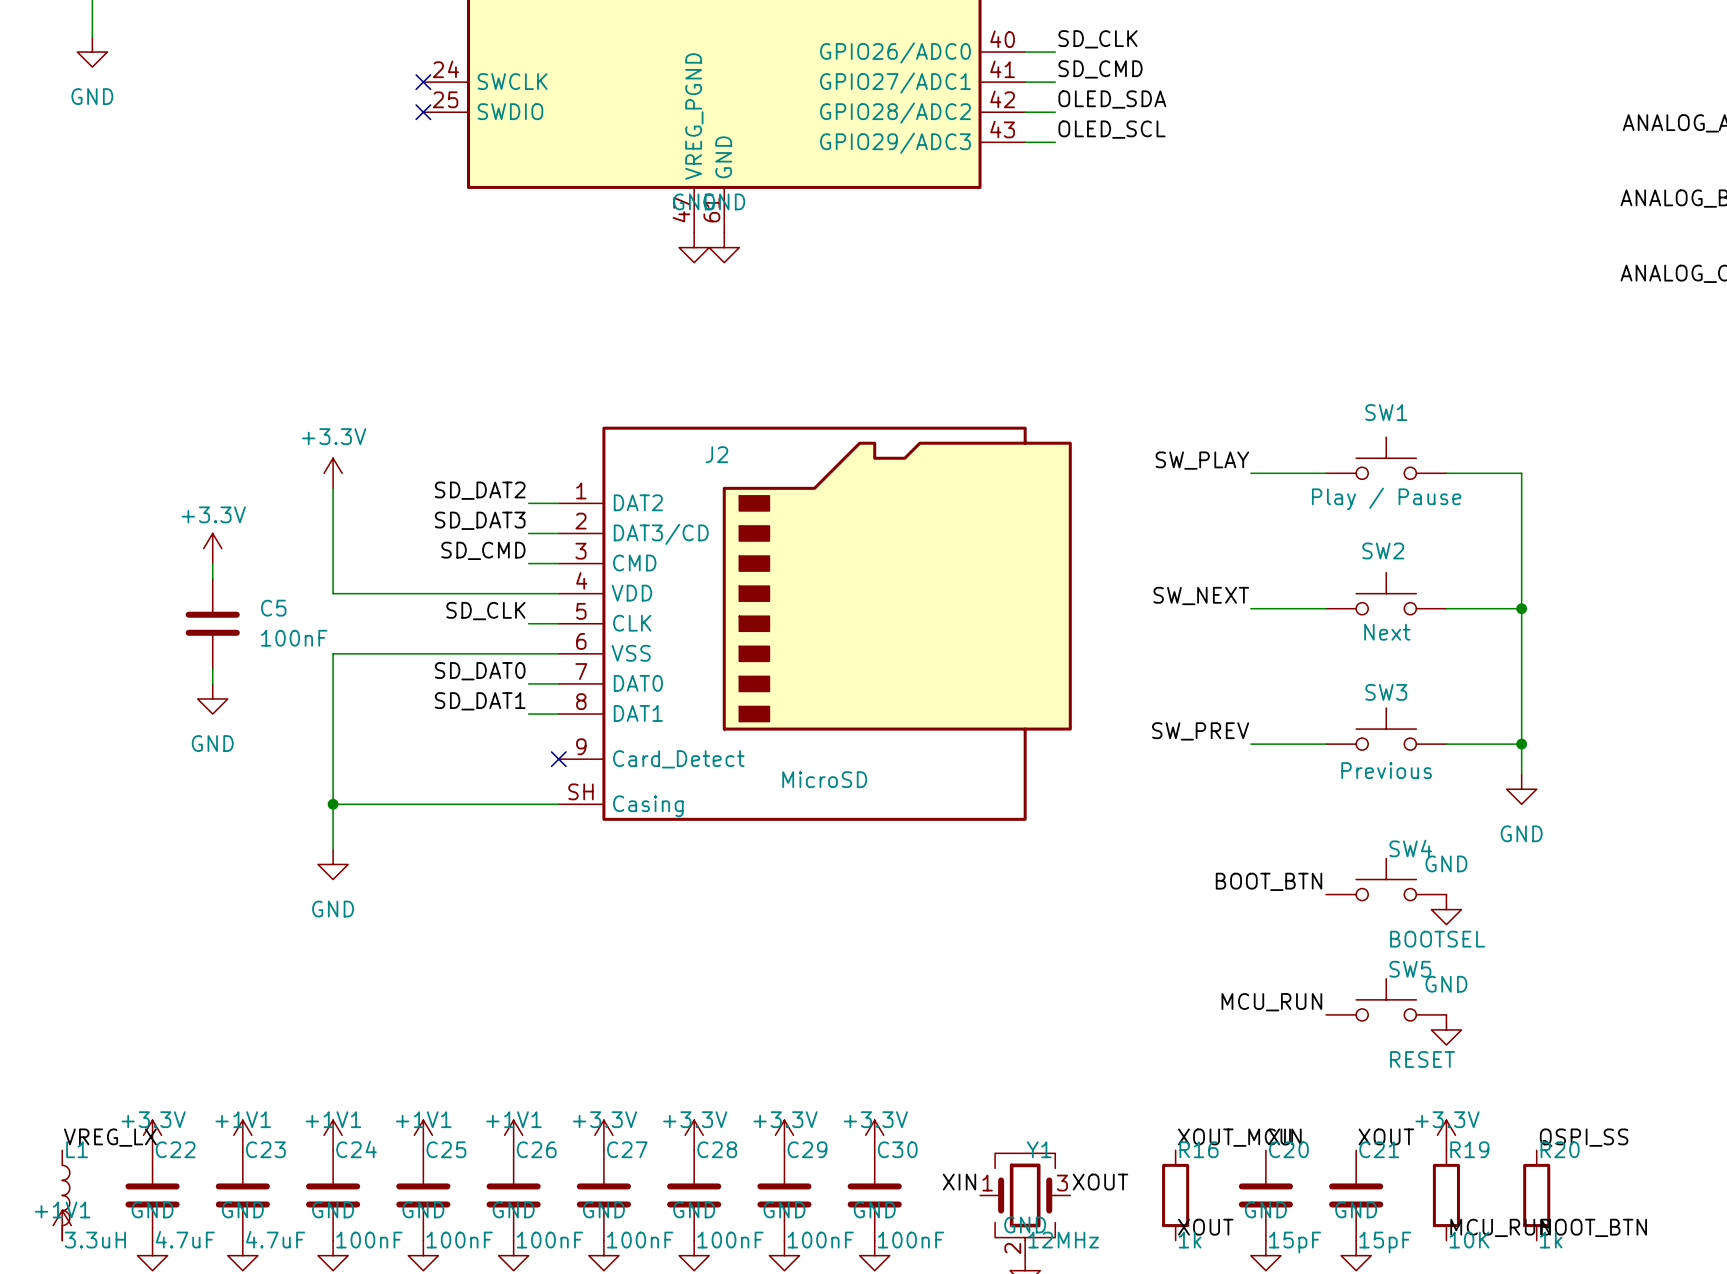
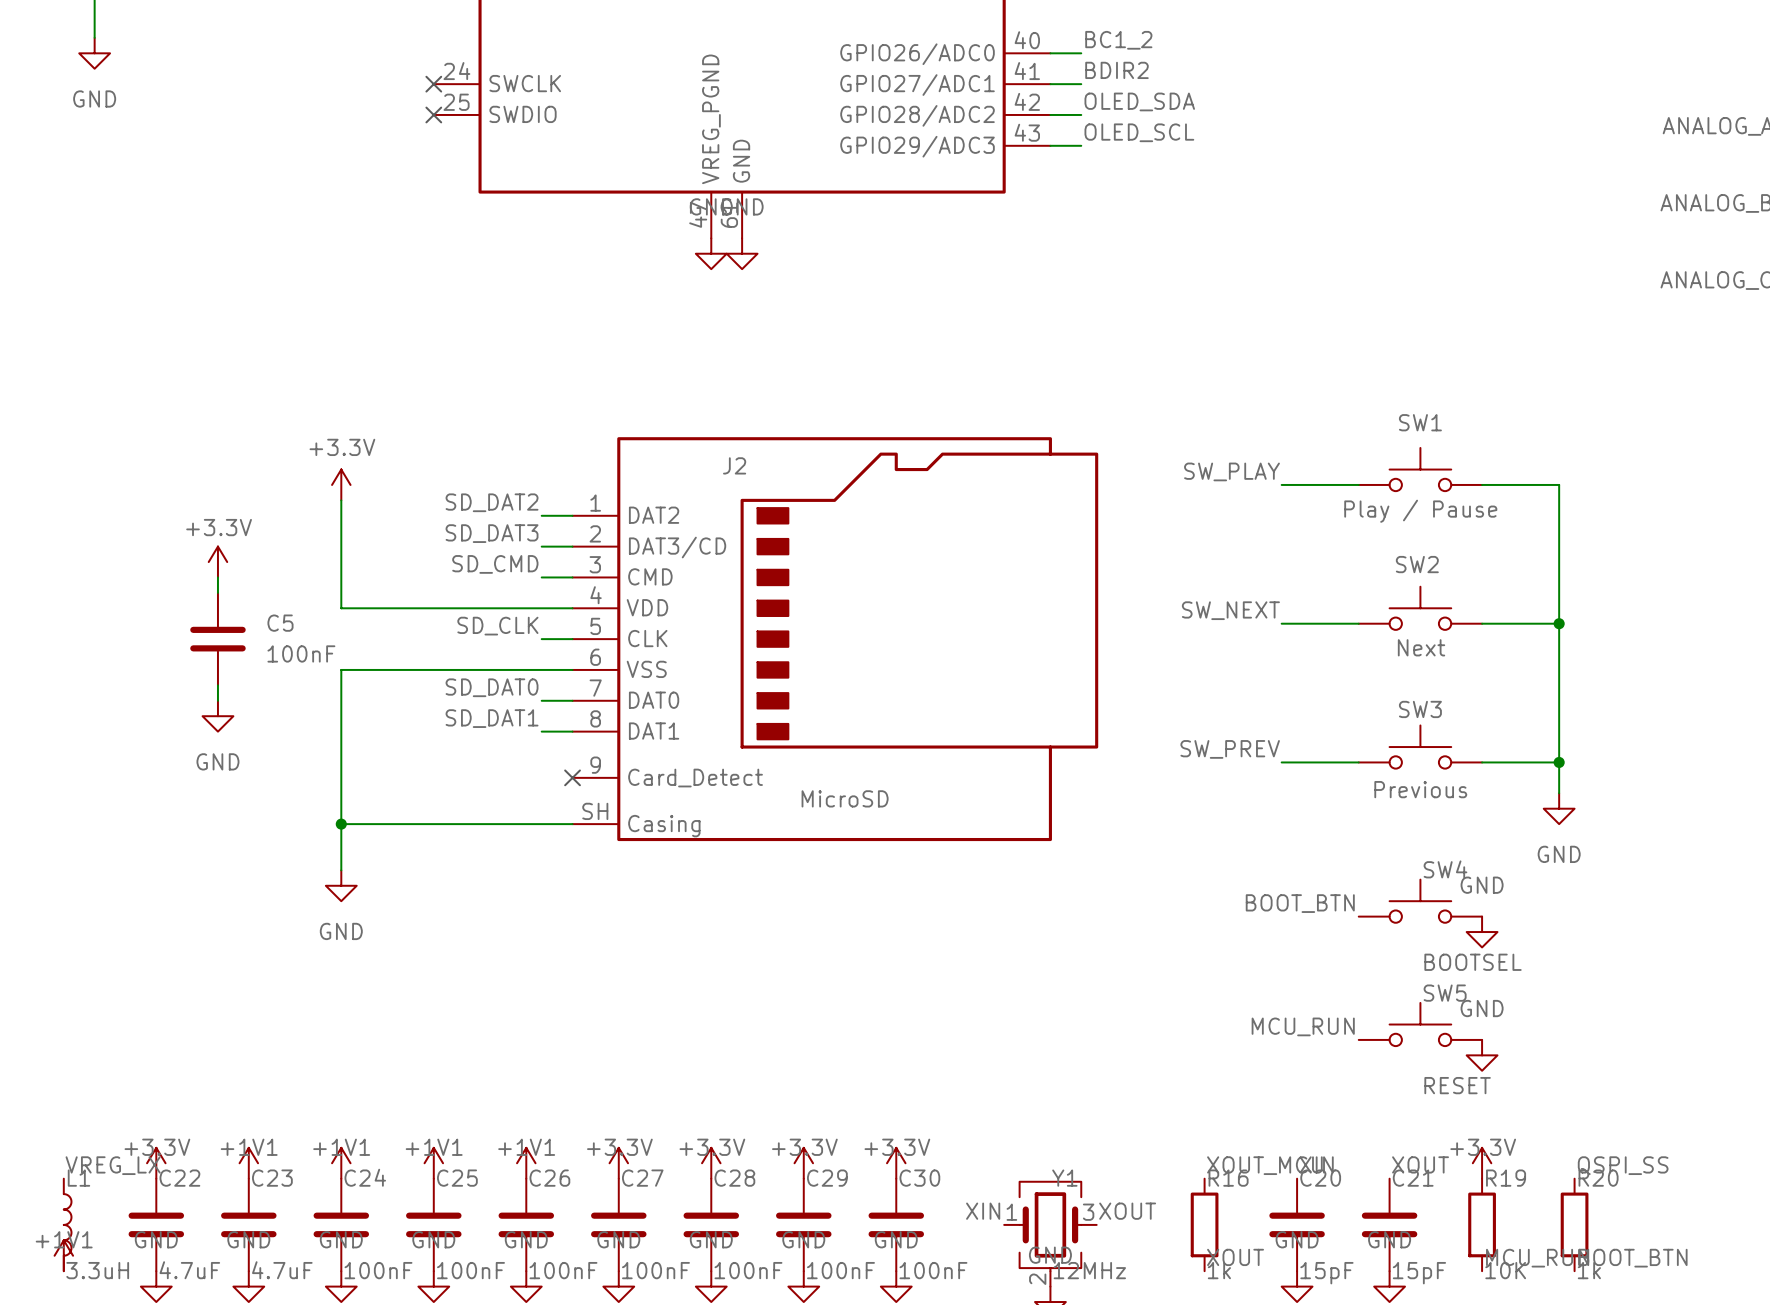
label: SD_CLK (1098, 39) -> BC1_2 (1118, 40)
label: SD_CMD (1100, 69) -> BDIR2 (1116, 70)

